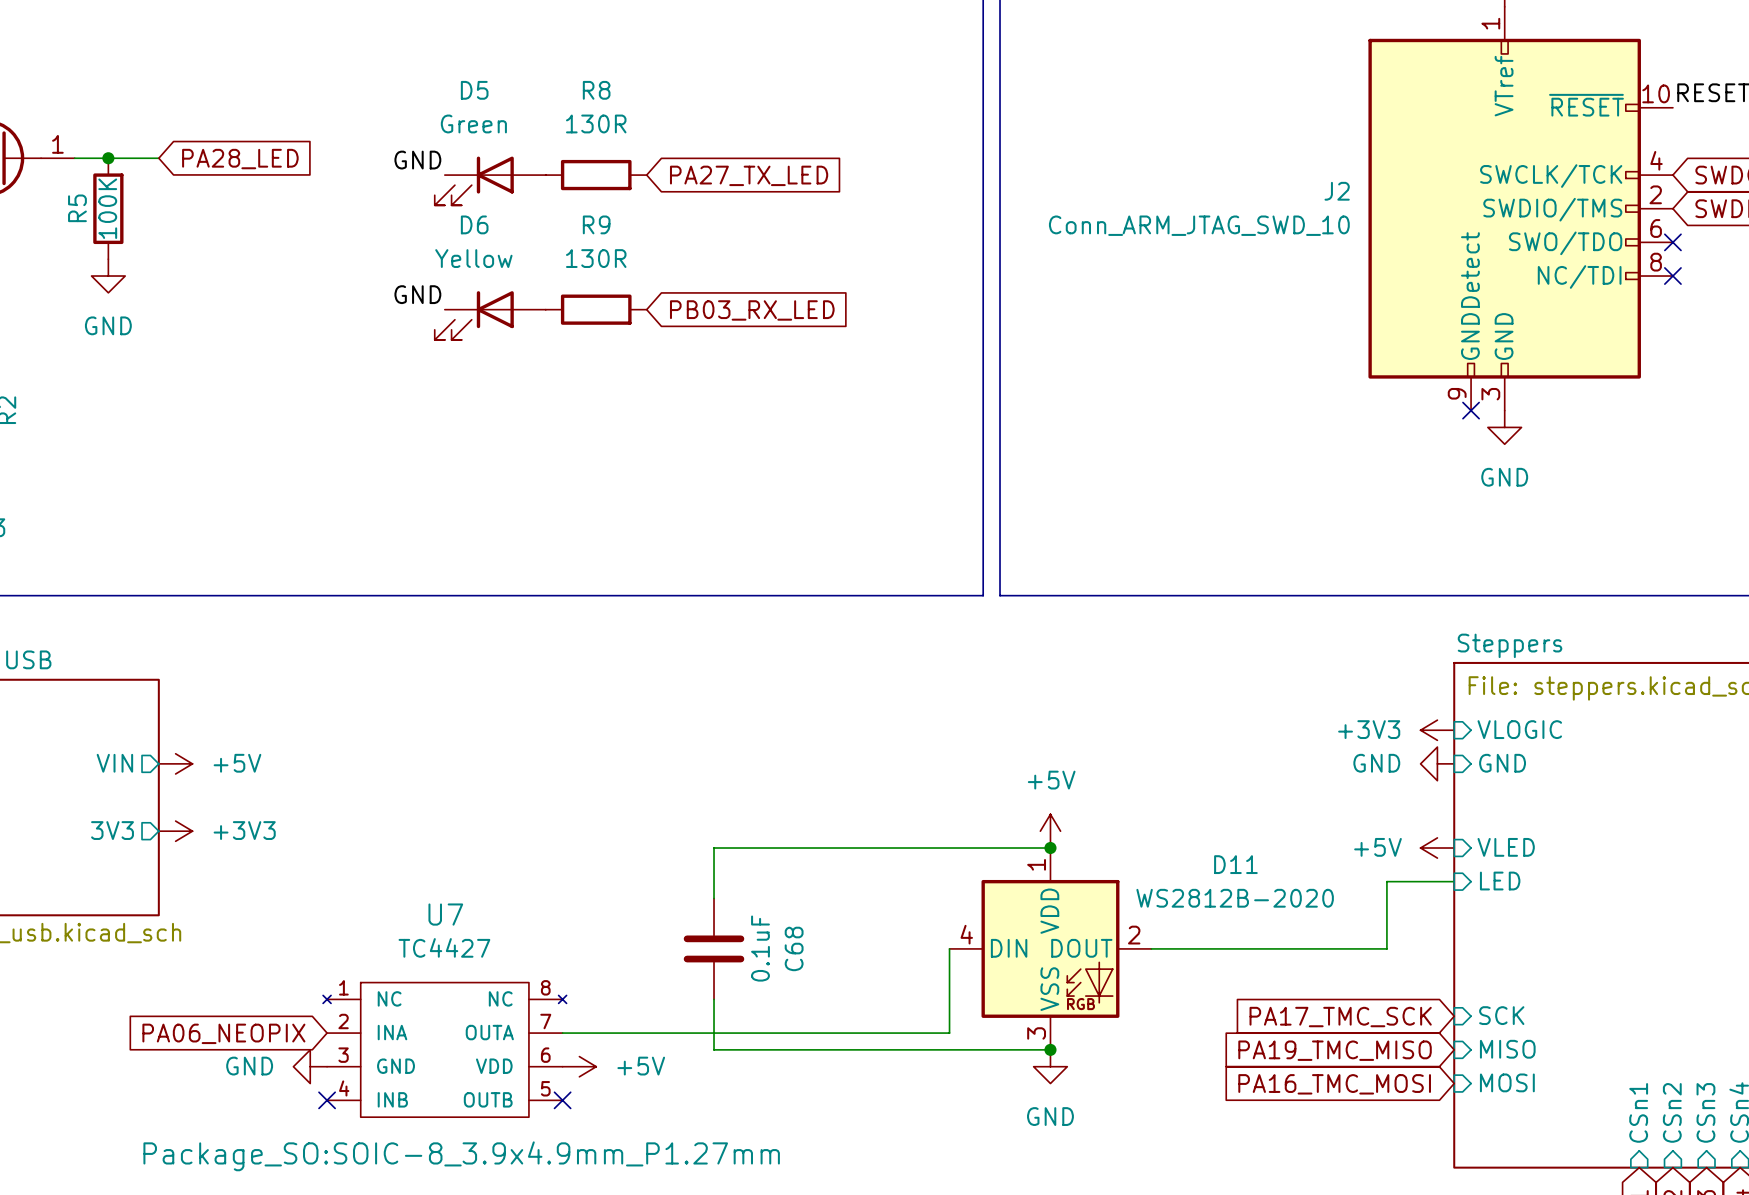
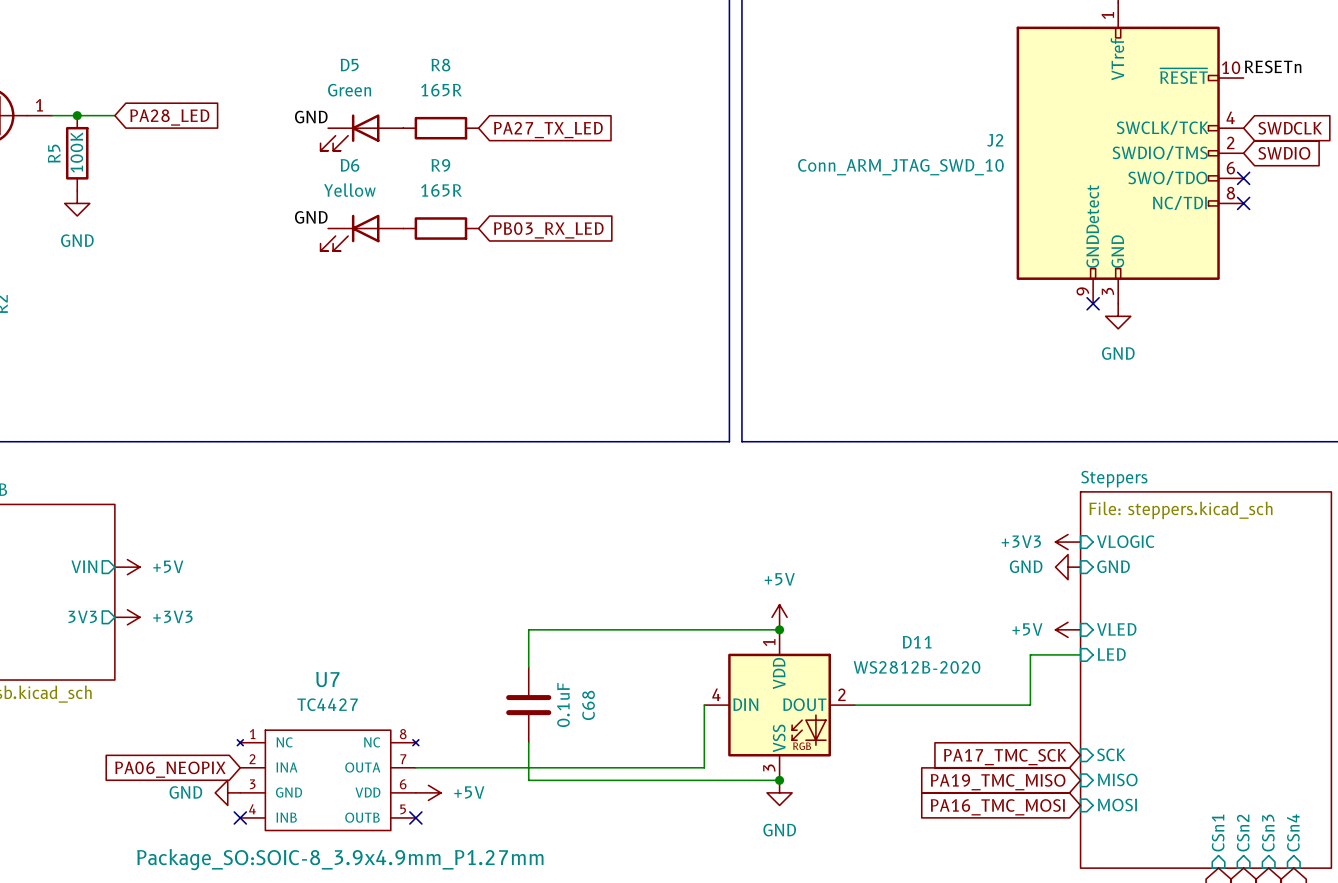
R8 value: 130R (596, 123) -> 165R (441, 90)
R9 value: 130R (596, 258) -> 165R (441, 190)

